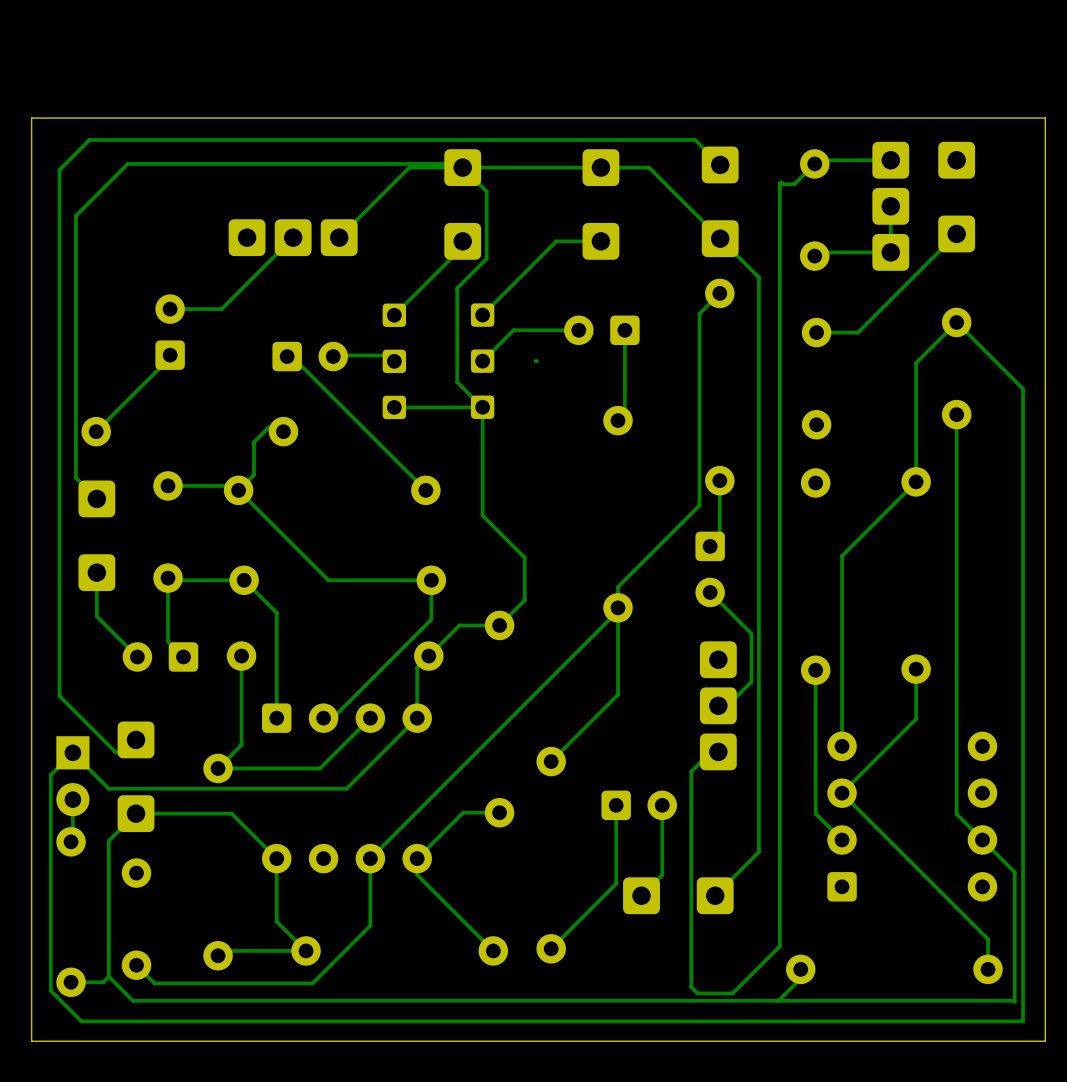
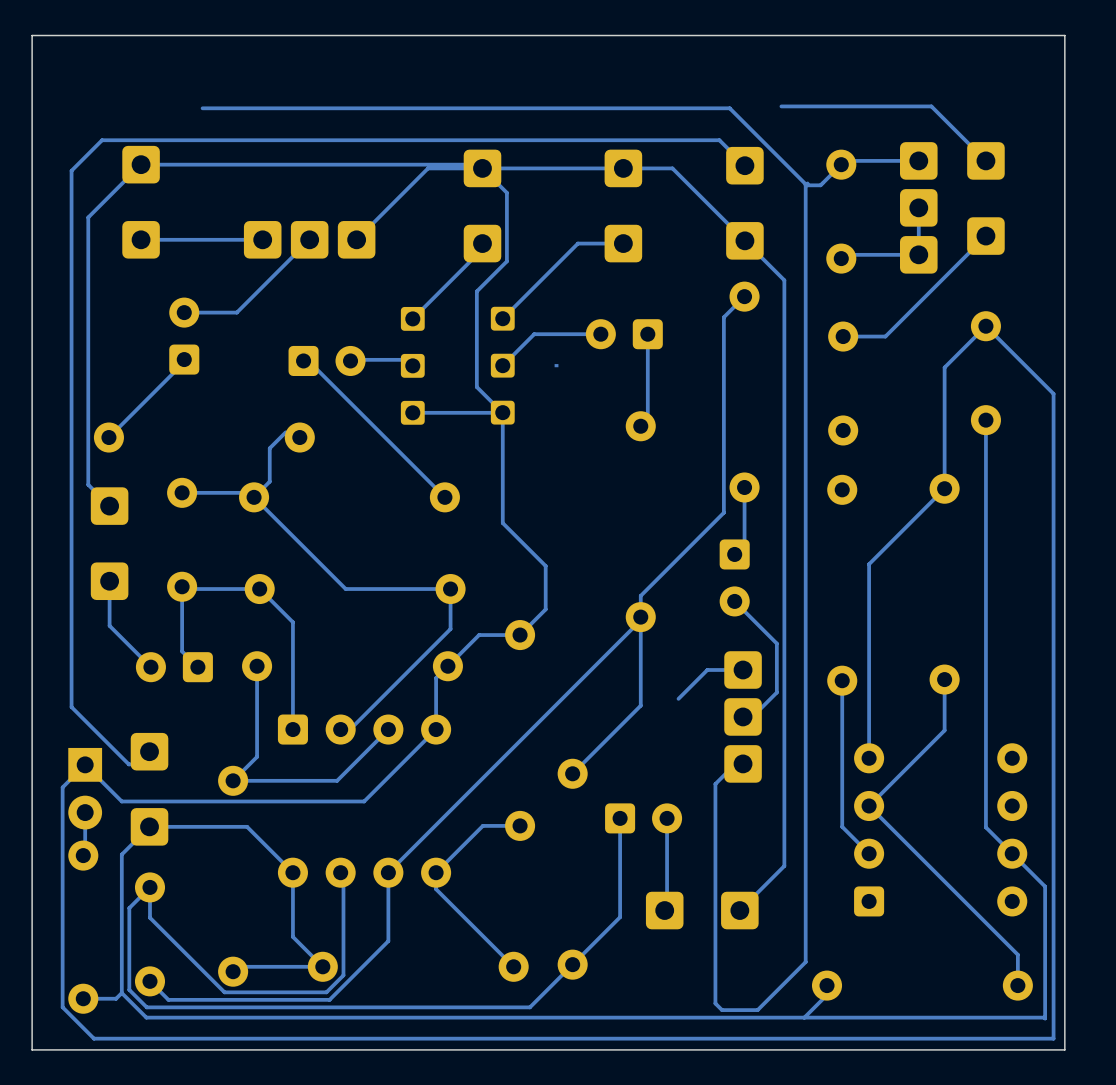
track: none -> (781, 106) (931, 106) (985, 160)
track: none -> (202, 108) (729, 108) (805, 184)
board edge: (1045, 118) (31, 118) (31, 1041) (1045, 1041) (1045, 118) -> (1064, 35) (1064, 1049) (32, 1049) (32, 35) (1064, 35)
part: none -> (141, 202)
track: none -> (262, 239) (141, 239)
track: none -> (743, 669) (707, 669) (678, 698)
track: (616, 805) (616, 883) (597, 902) -> (620, 818) (620, 917)
part position: (639, 805) -> (643, 818)
track: (662, 805) (662, 875) (643, 893) -> (667, 818) (667, 908)
track: none -> (343, 875) (343, 975) (326, 992) (224, 992) (149, 917) (149, 887) (129, 908) (129, 989) (146, 1007) (529, 1007) (572, 964)

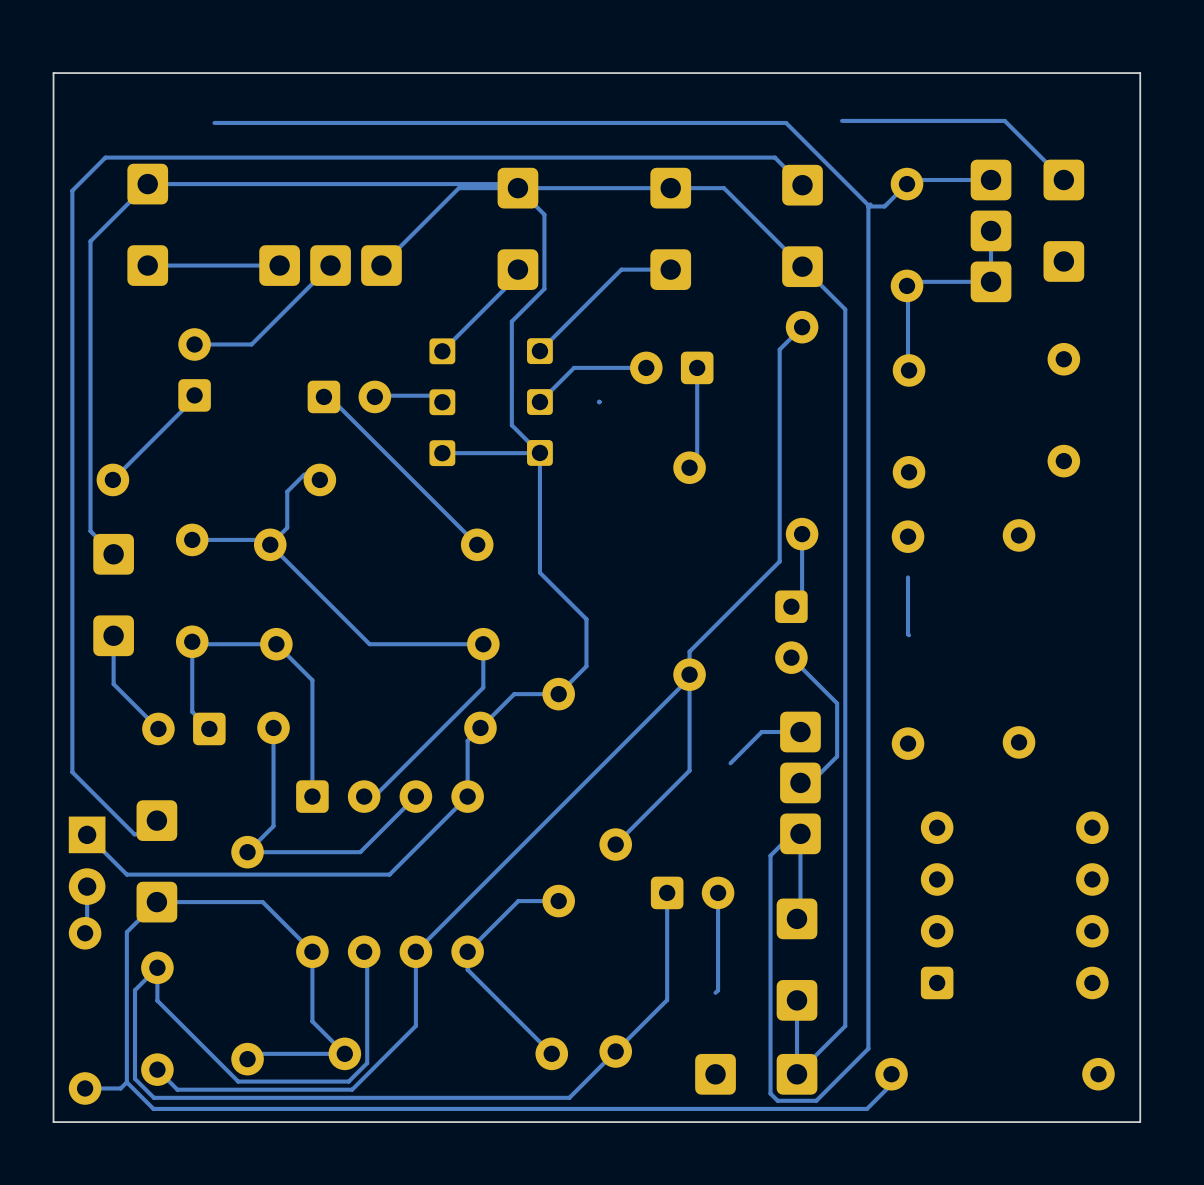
board edge: (1064, 35) (32, 35) (32, 1049) (1064, 1049) (1064, 35) -> (1140, 73) (1140, 1122) (53, 1122) (53, 73) (1140, 73)
track: (985, 236) (885, 336) (843, 336) -> none
track: none -> (908, 291) (908, 370)
track: (985, 420) (985, 827) (1045, 886) (1045, 1018) (804, 1017) -> none
track: none -> (908, 577) (909, 635)
track: (944, 679) (944, 730) (869, 806) (1017, 954) (1017, 985) -> none
track: (842, 680) (842, 826) (869, 853) -> none
track: (869, 758) (869, 564) (944, 488) (944, 367) (985, 326) (1053, 393) (1053, 1038) (94, 1038) (62, 1007) (62, 787) (85, 764) -> none
track: none -> (800, 833) (800, 915) (797, 918)
track: (784, 866) (739, 910) -> (845, 944) (845, 1026) (797, 1074) (797, 1000)
part: none -> (797, 959)
part: (702, 910) -> none
part: none -> (756, 1074)

